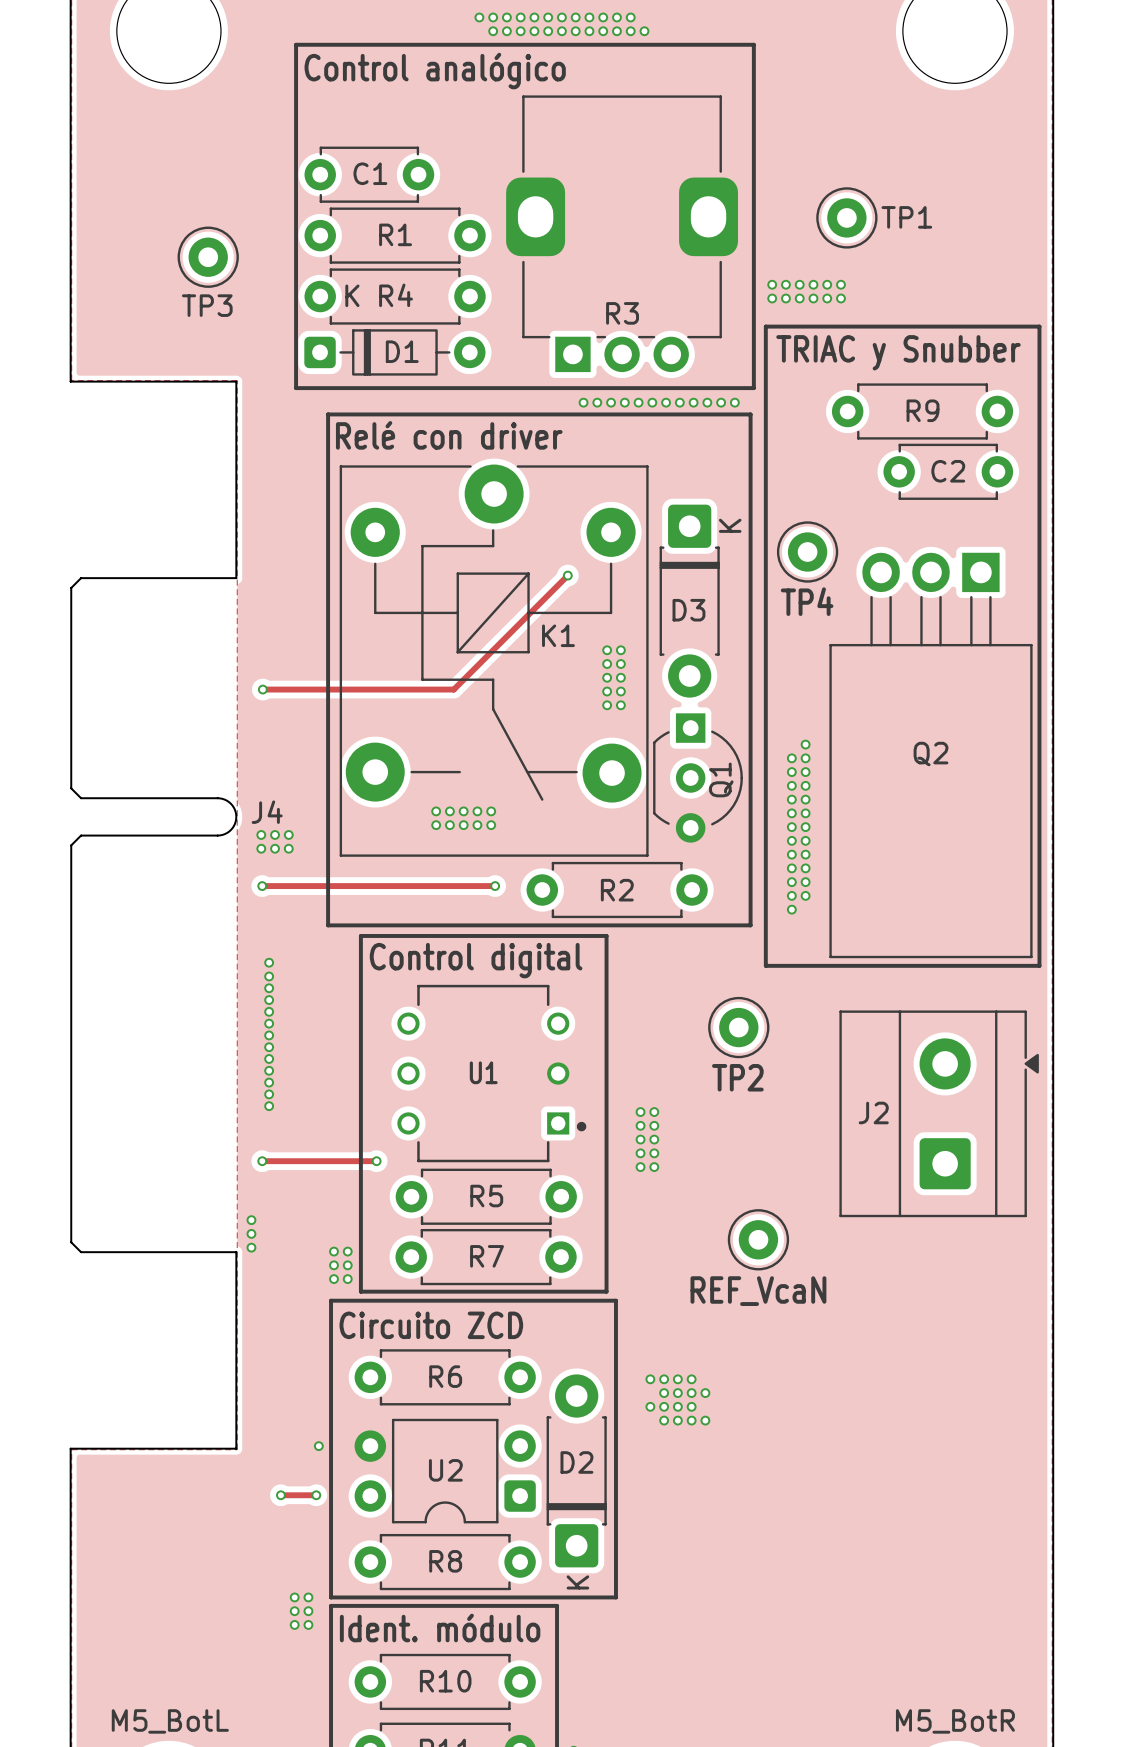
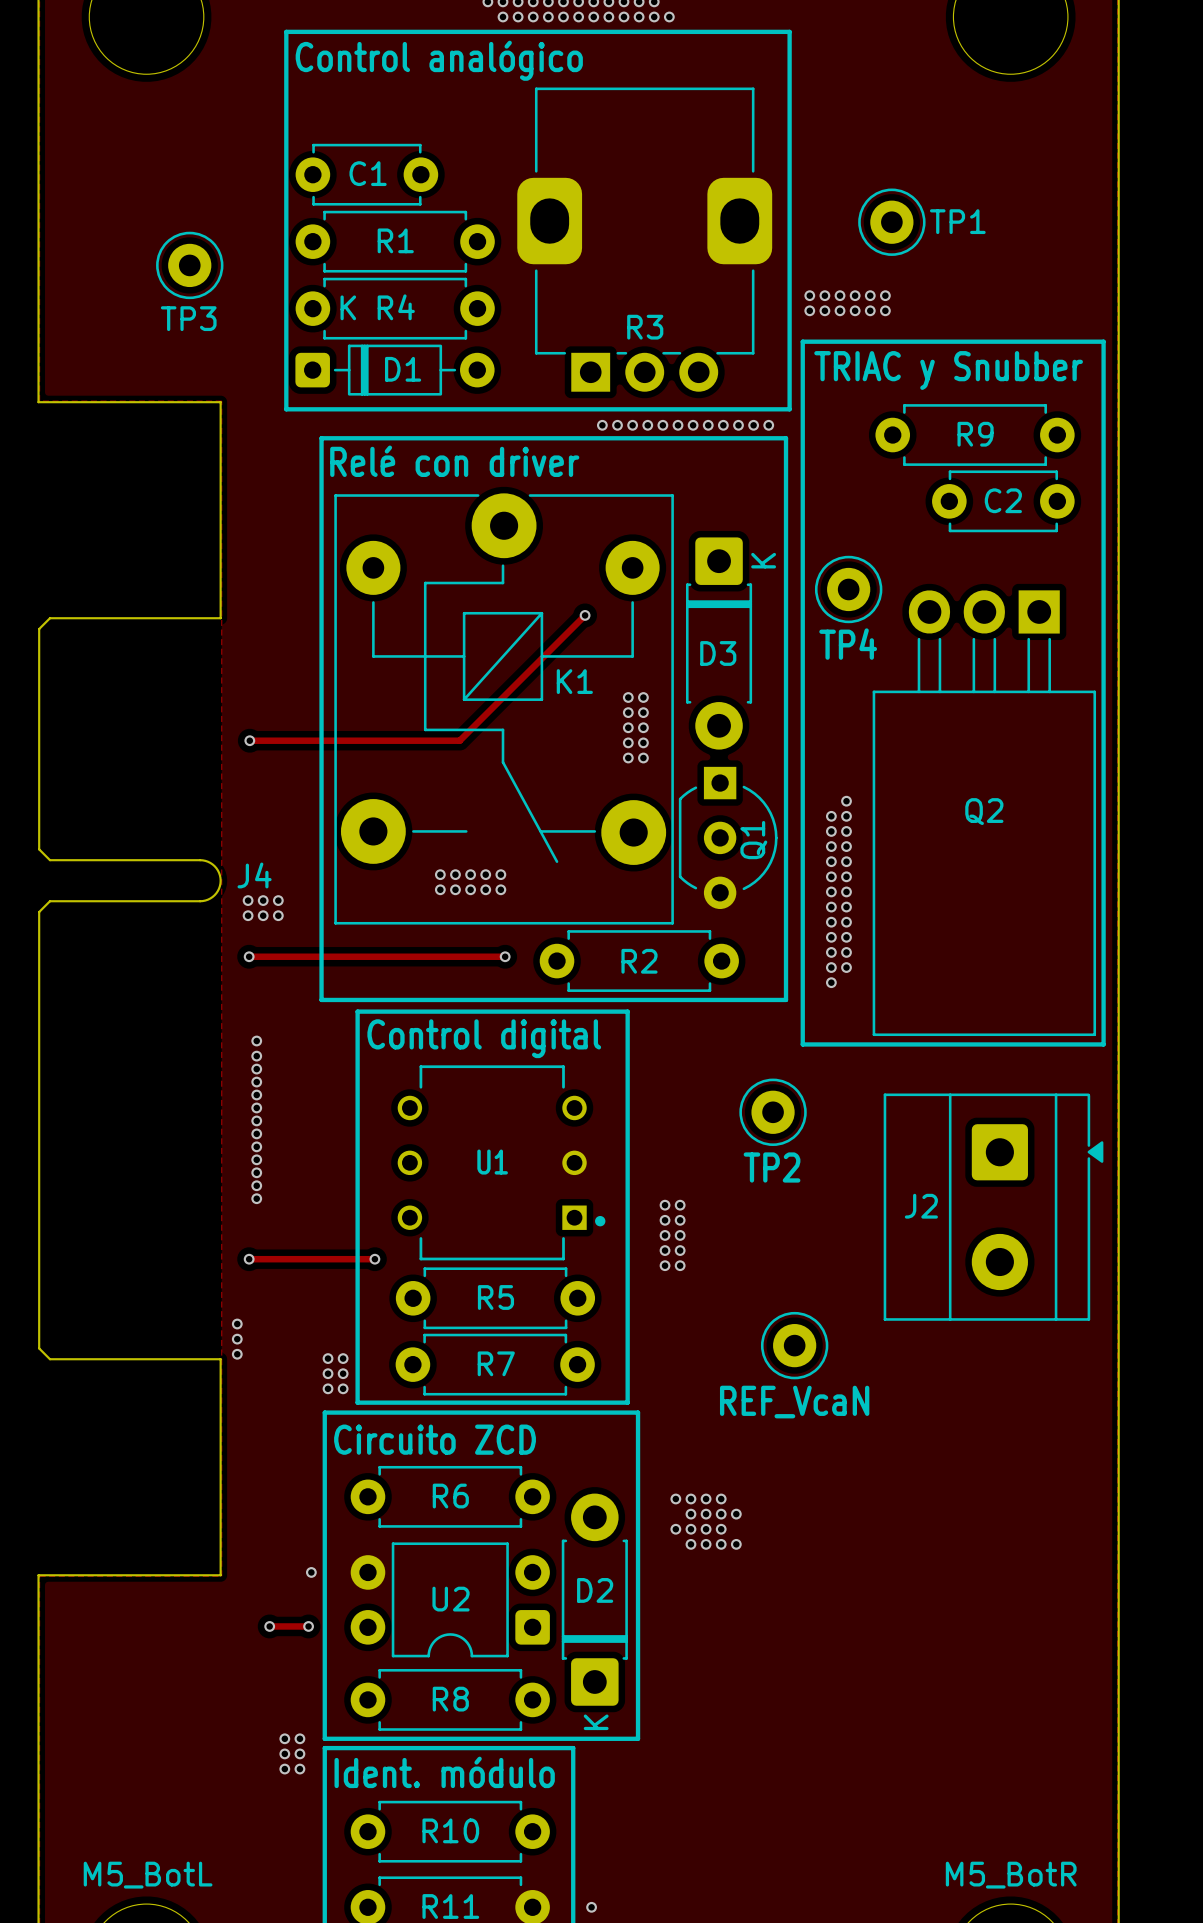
J2 footprint: [839, 1010, 1039, 1218] -> [883, 1093, 1104, 1321]

